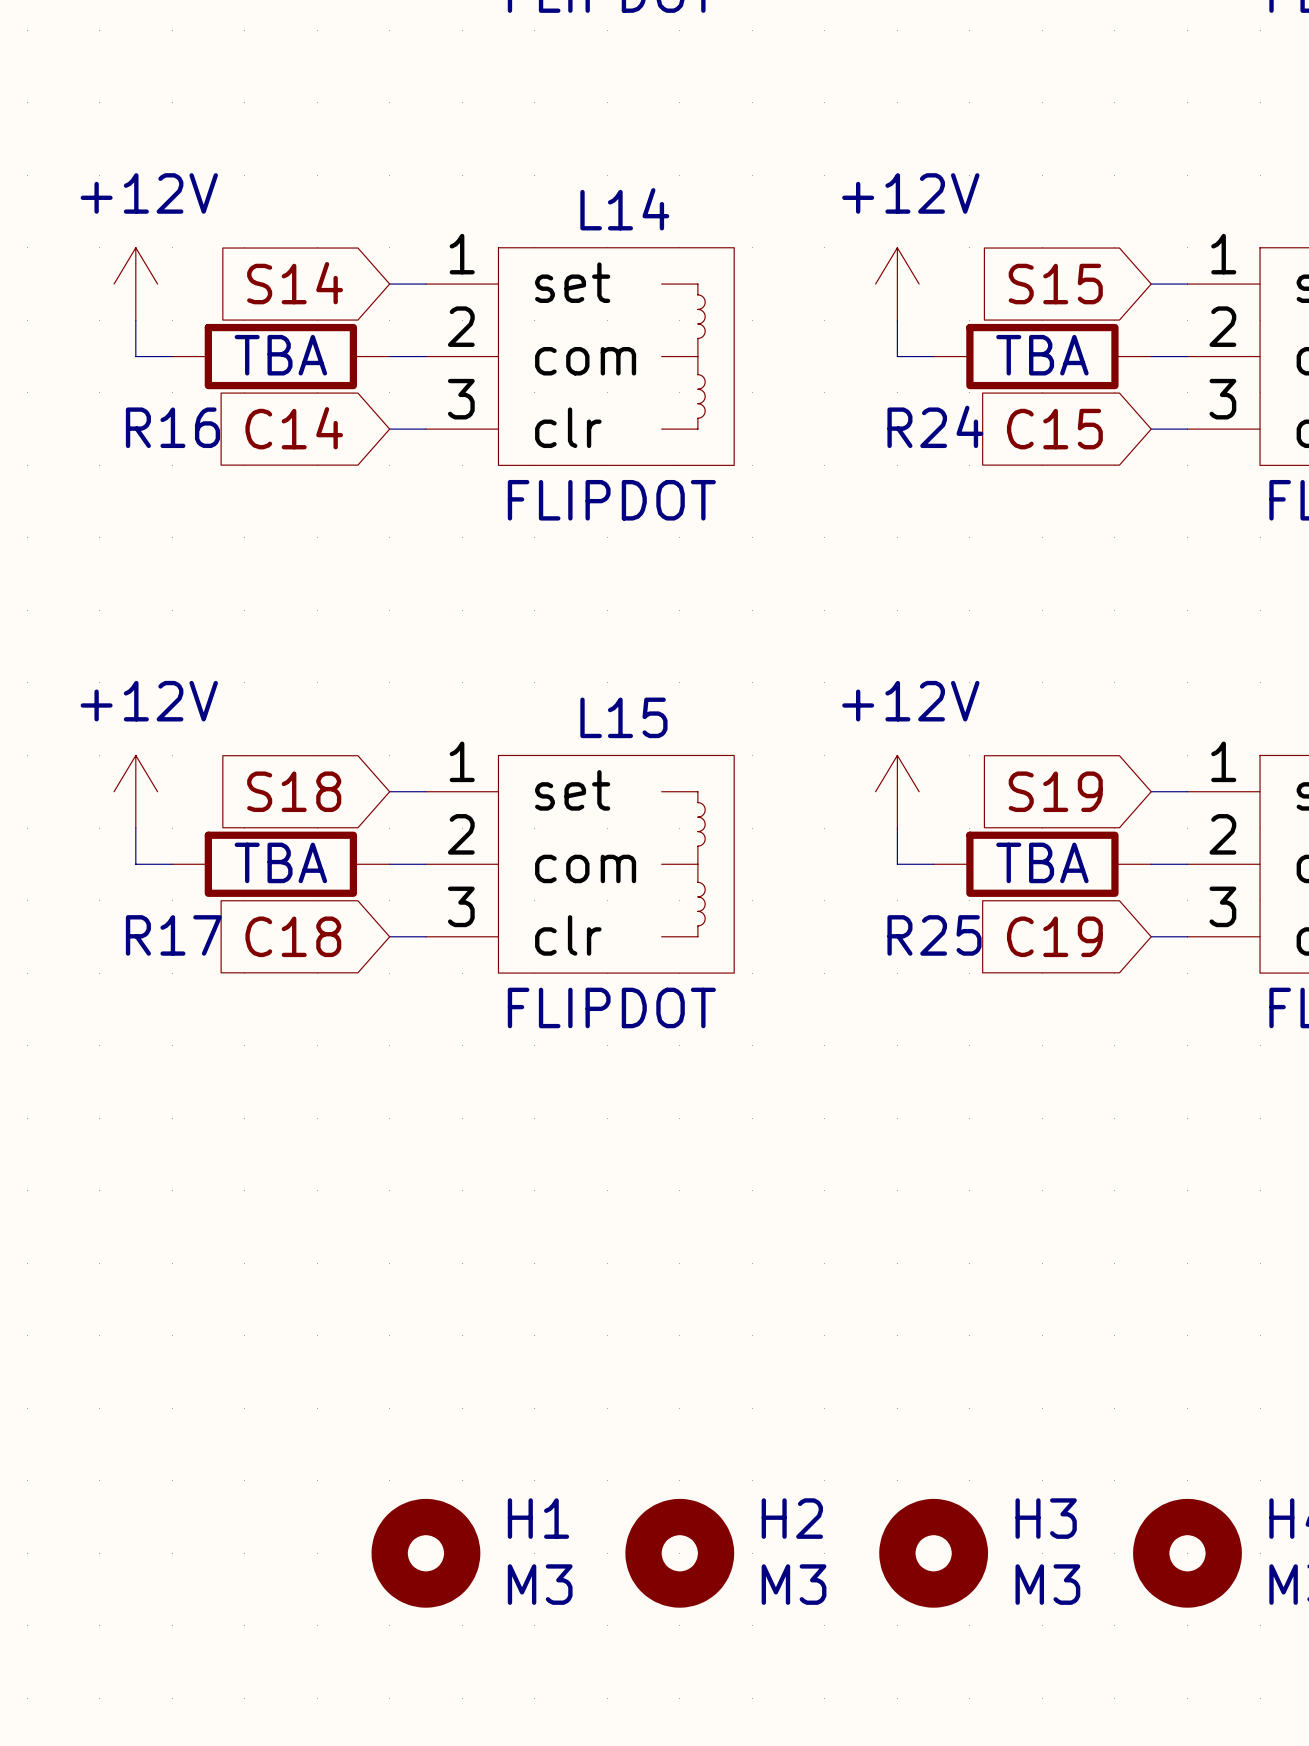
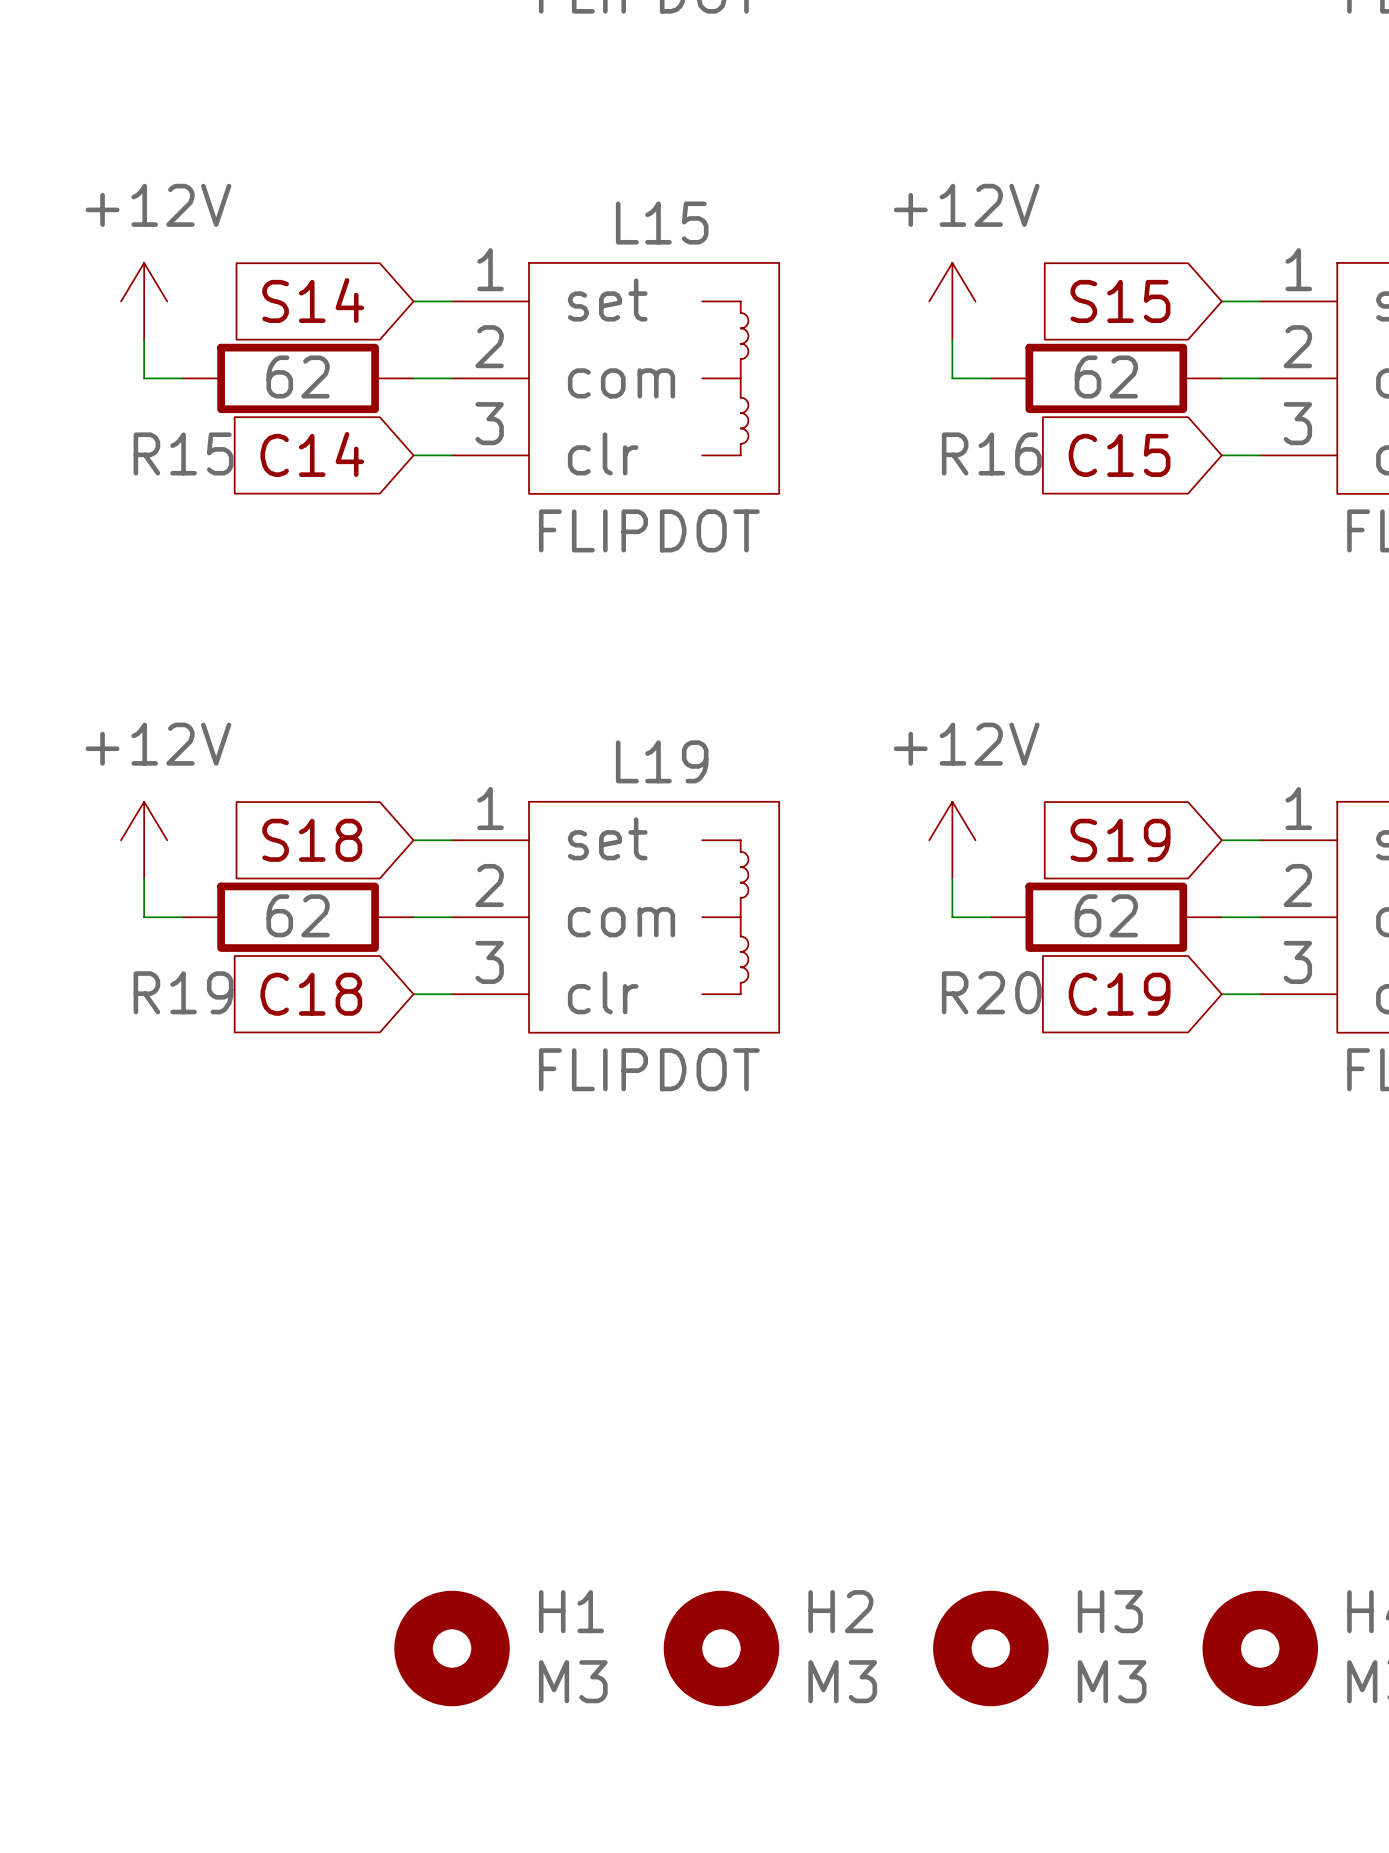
L14 name: L14 (624, 209) -> L15 (662, 223)
R16 value: TBA (280, 355) -> 62 (298, 376)
R24 value: TBA (1042, 355) -> 62 (1106, 376)
R24 name: R24 (935, 426) -> R16 (991, 453)
R16 name: R16 (172, 427) -> R15 (183, 453)
L15 name: L15 (623, 717) -> L19 (662, 761)
R17 value: TBA (280, 862) -> 62 (298, 915)
R25 value: TBA (1042, 862) -> 62 (1106, 915)
R17 name: R17 (173, 935) -> R19 (183, 992)
R25 name: R25 (934, 935) -> R20 (991, 992)

